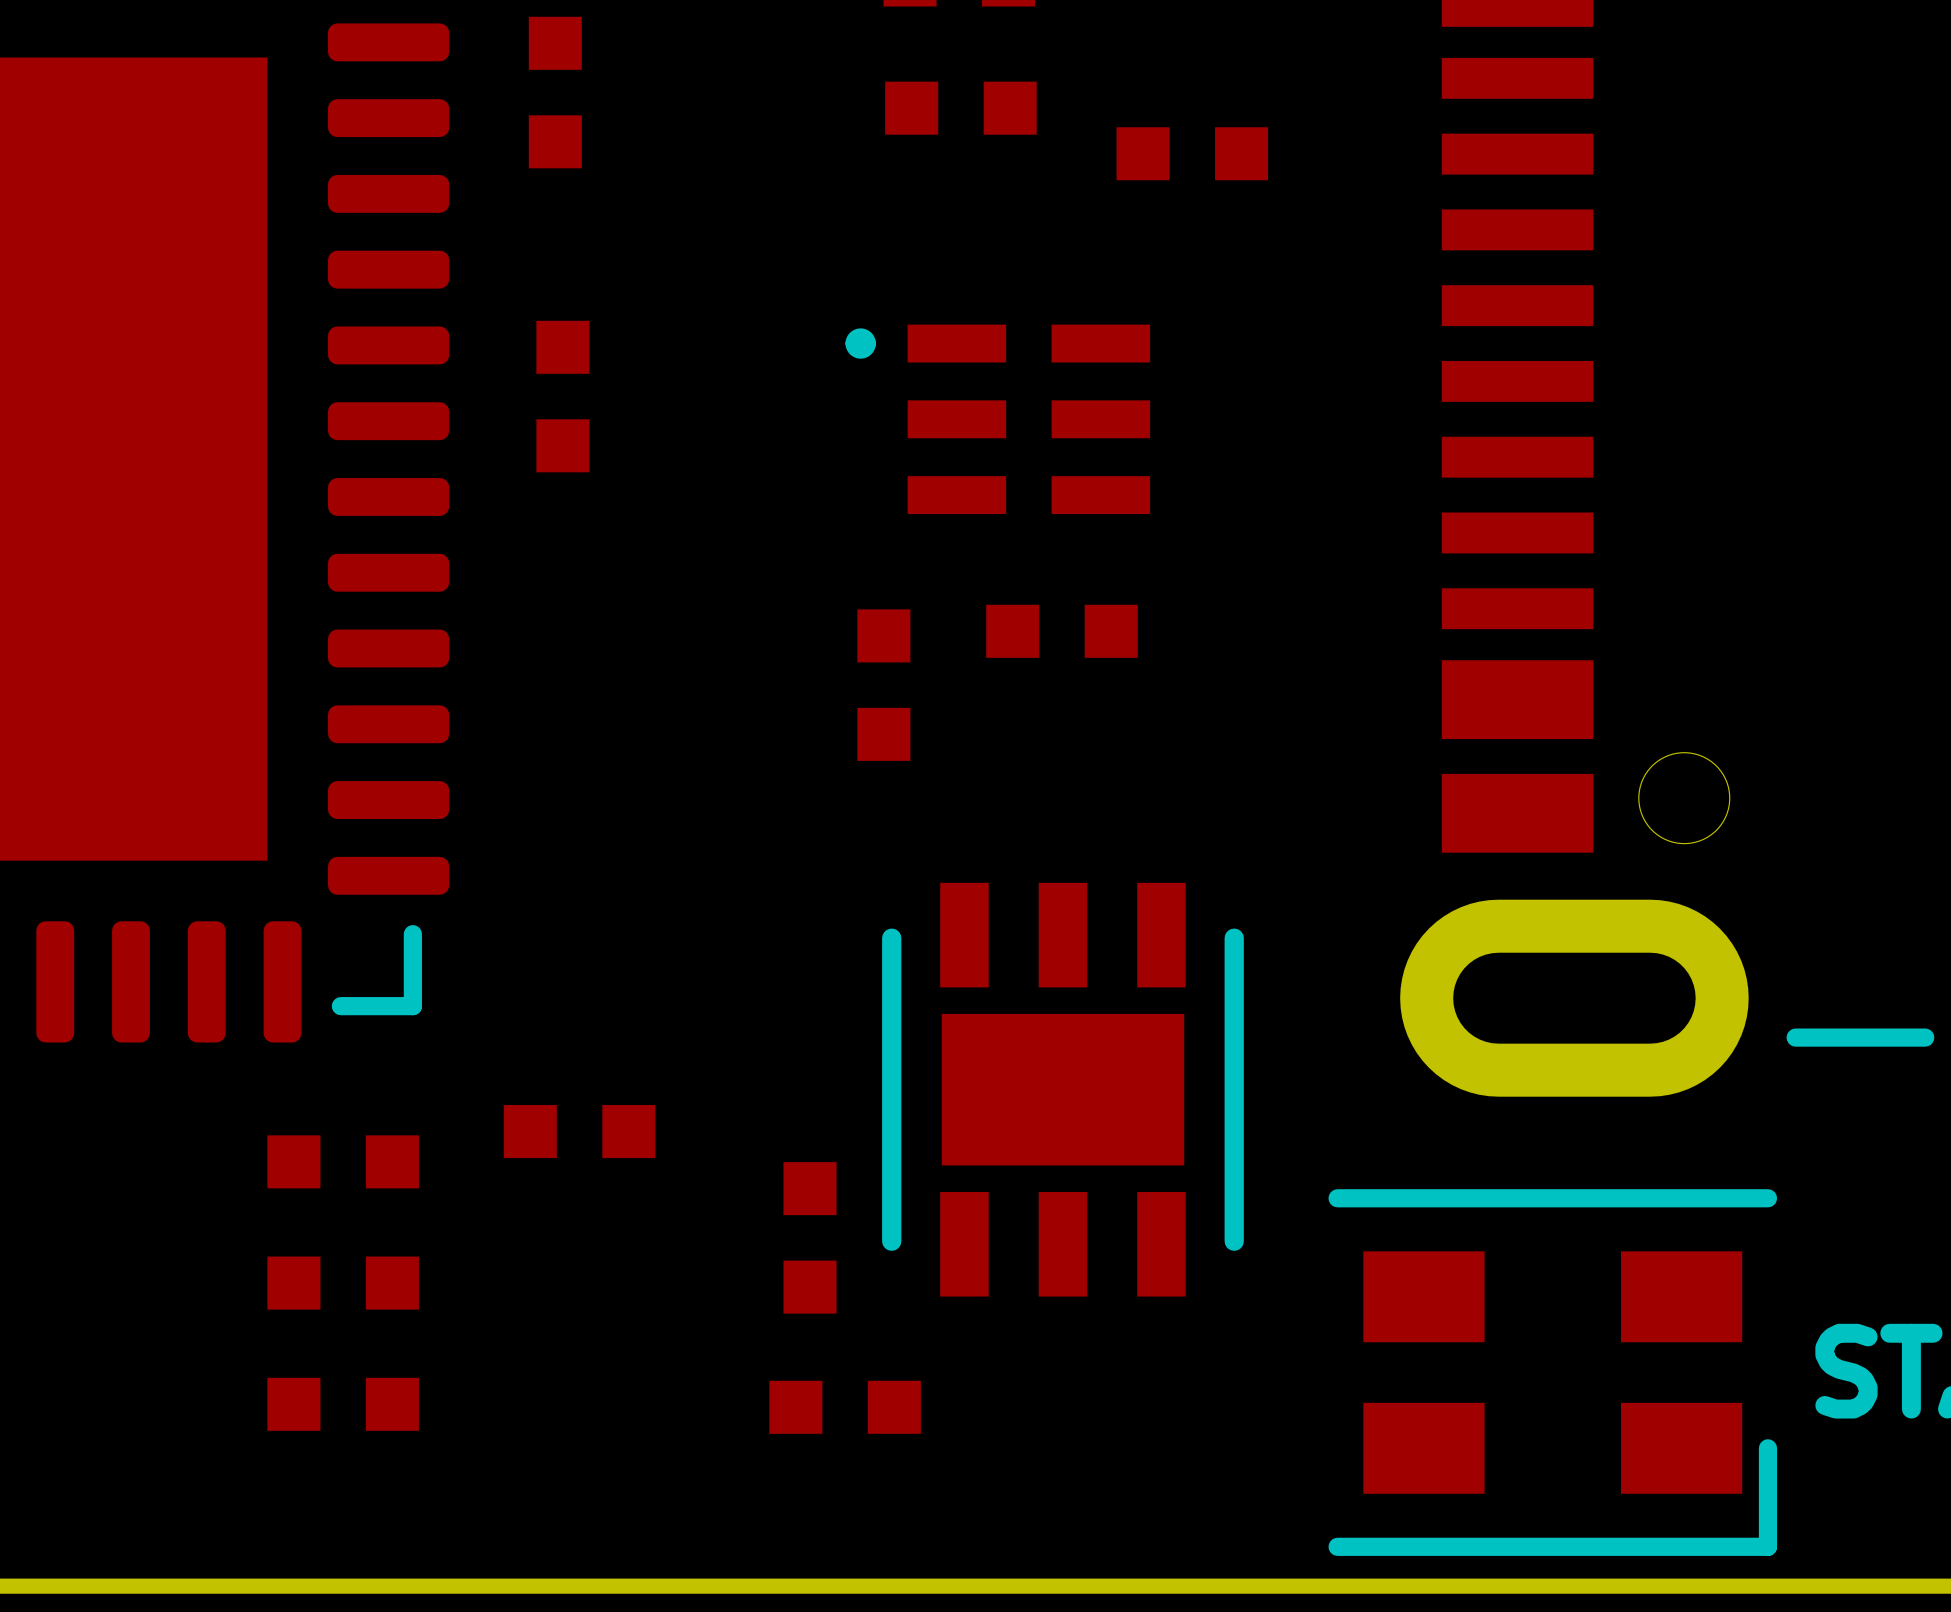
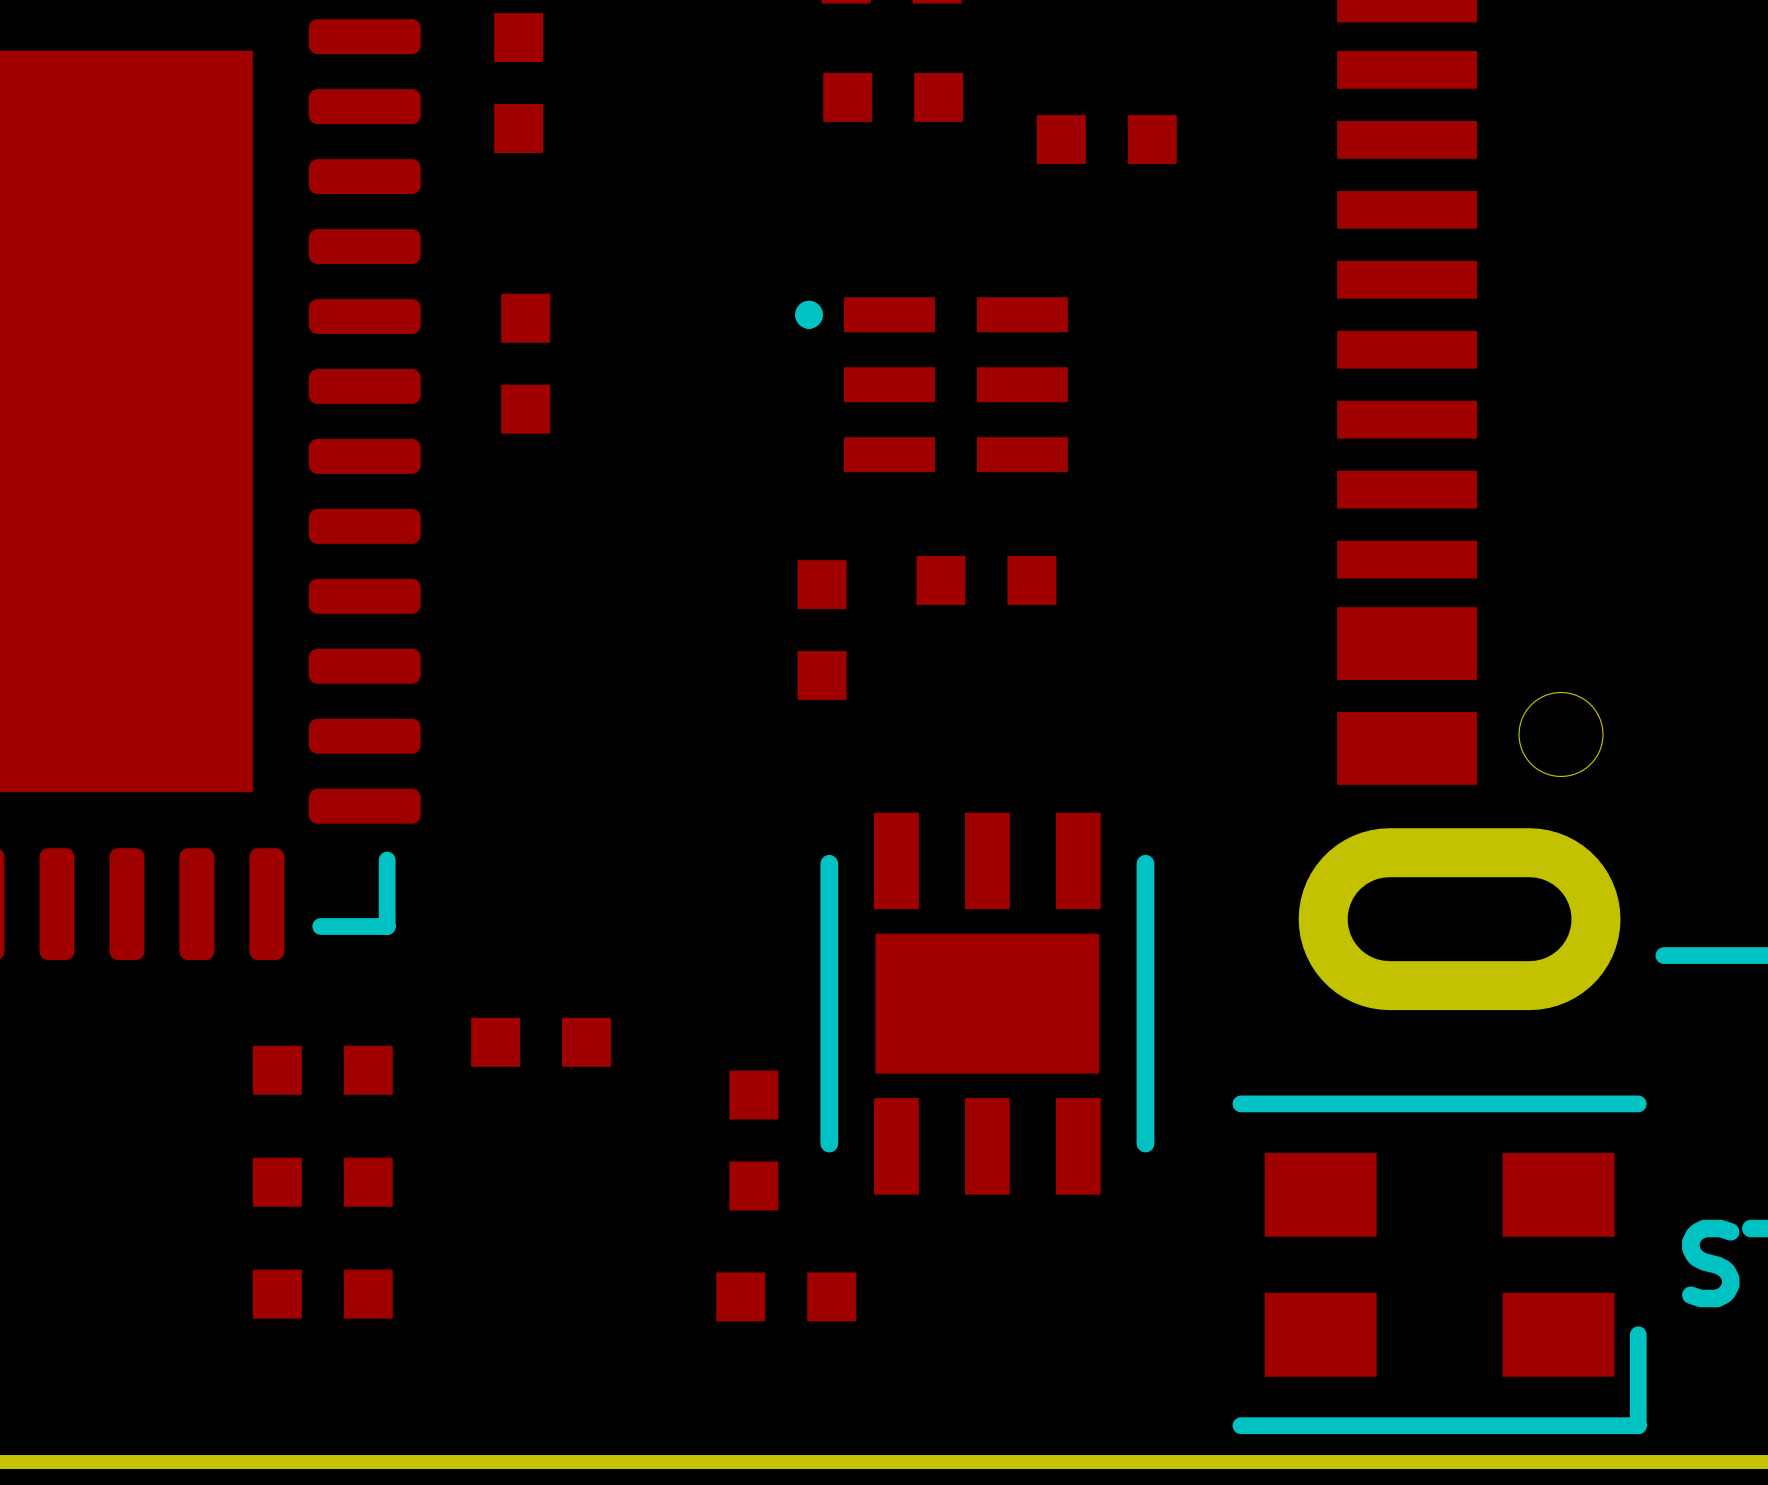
part footprint: [845, 324, 1151, 515] -> [795, 297, 1068, 473]

